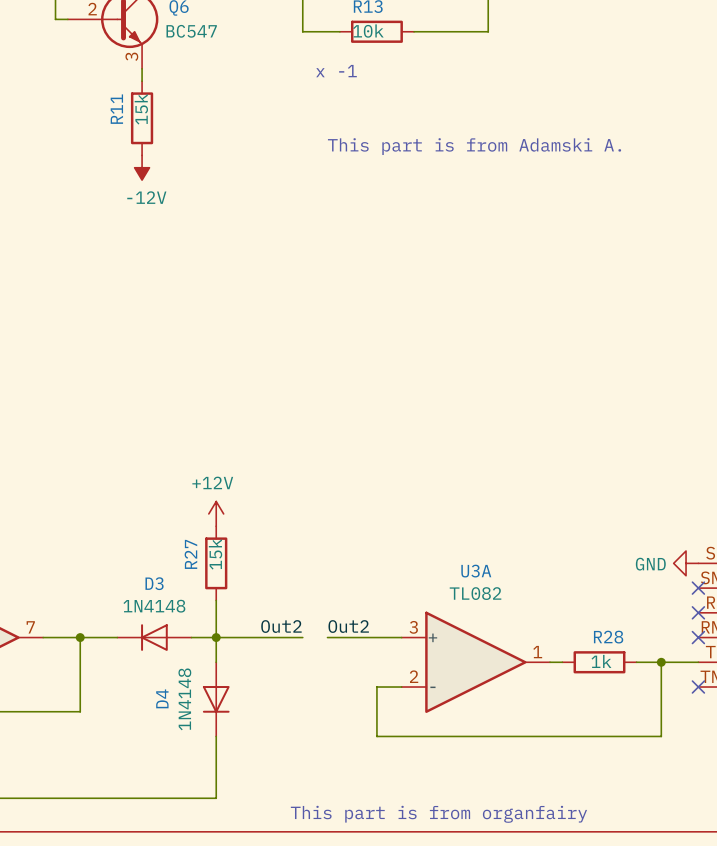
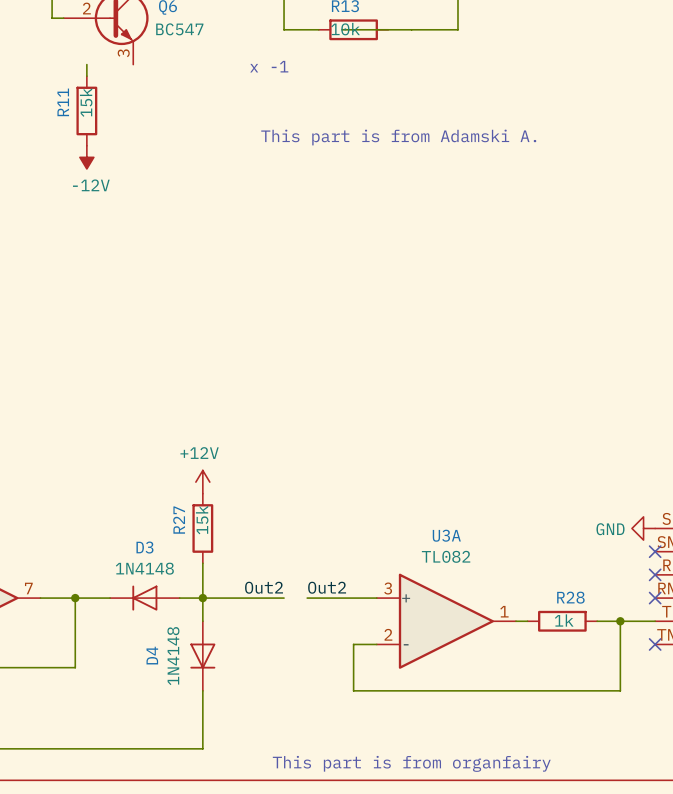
wire: none -> (342, 29) (388, 29)
wire: (142, 68) (142, 81) -> (86, 64) (86, 76)
text position: x -1 (336, 71) -> x -1 (269, 66)
R11 position: (142, 118) -> (86, 110)
text position: This part is from Adamski A. (474, 146) -> This part is from Adamski A. (398, 137)
power symbol position: -12V (142, 167) -> -12V (86, 157)

